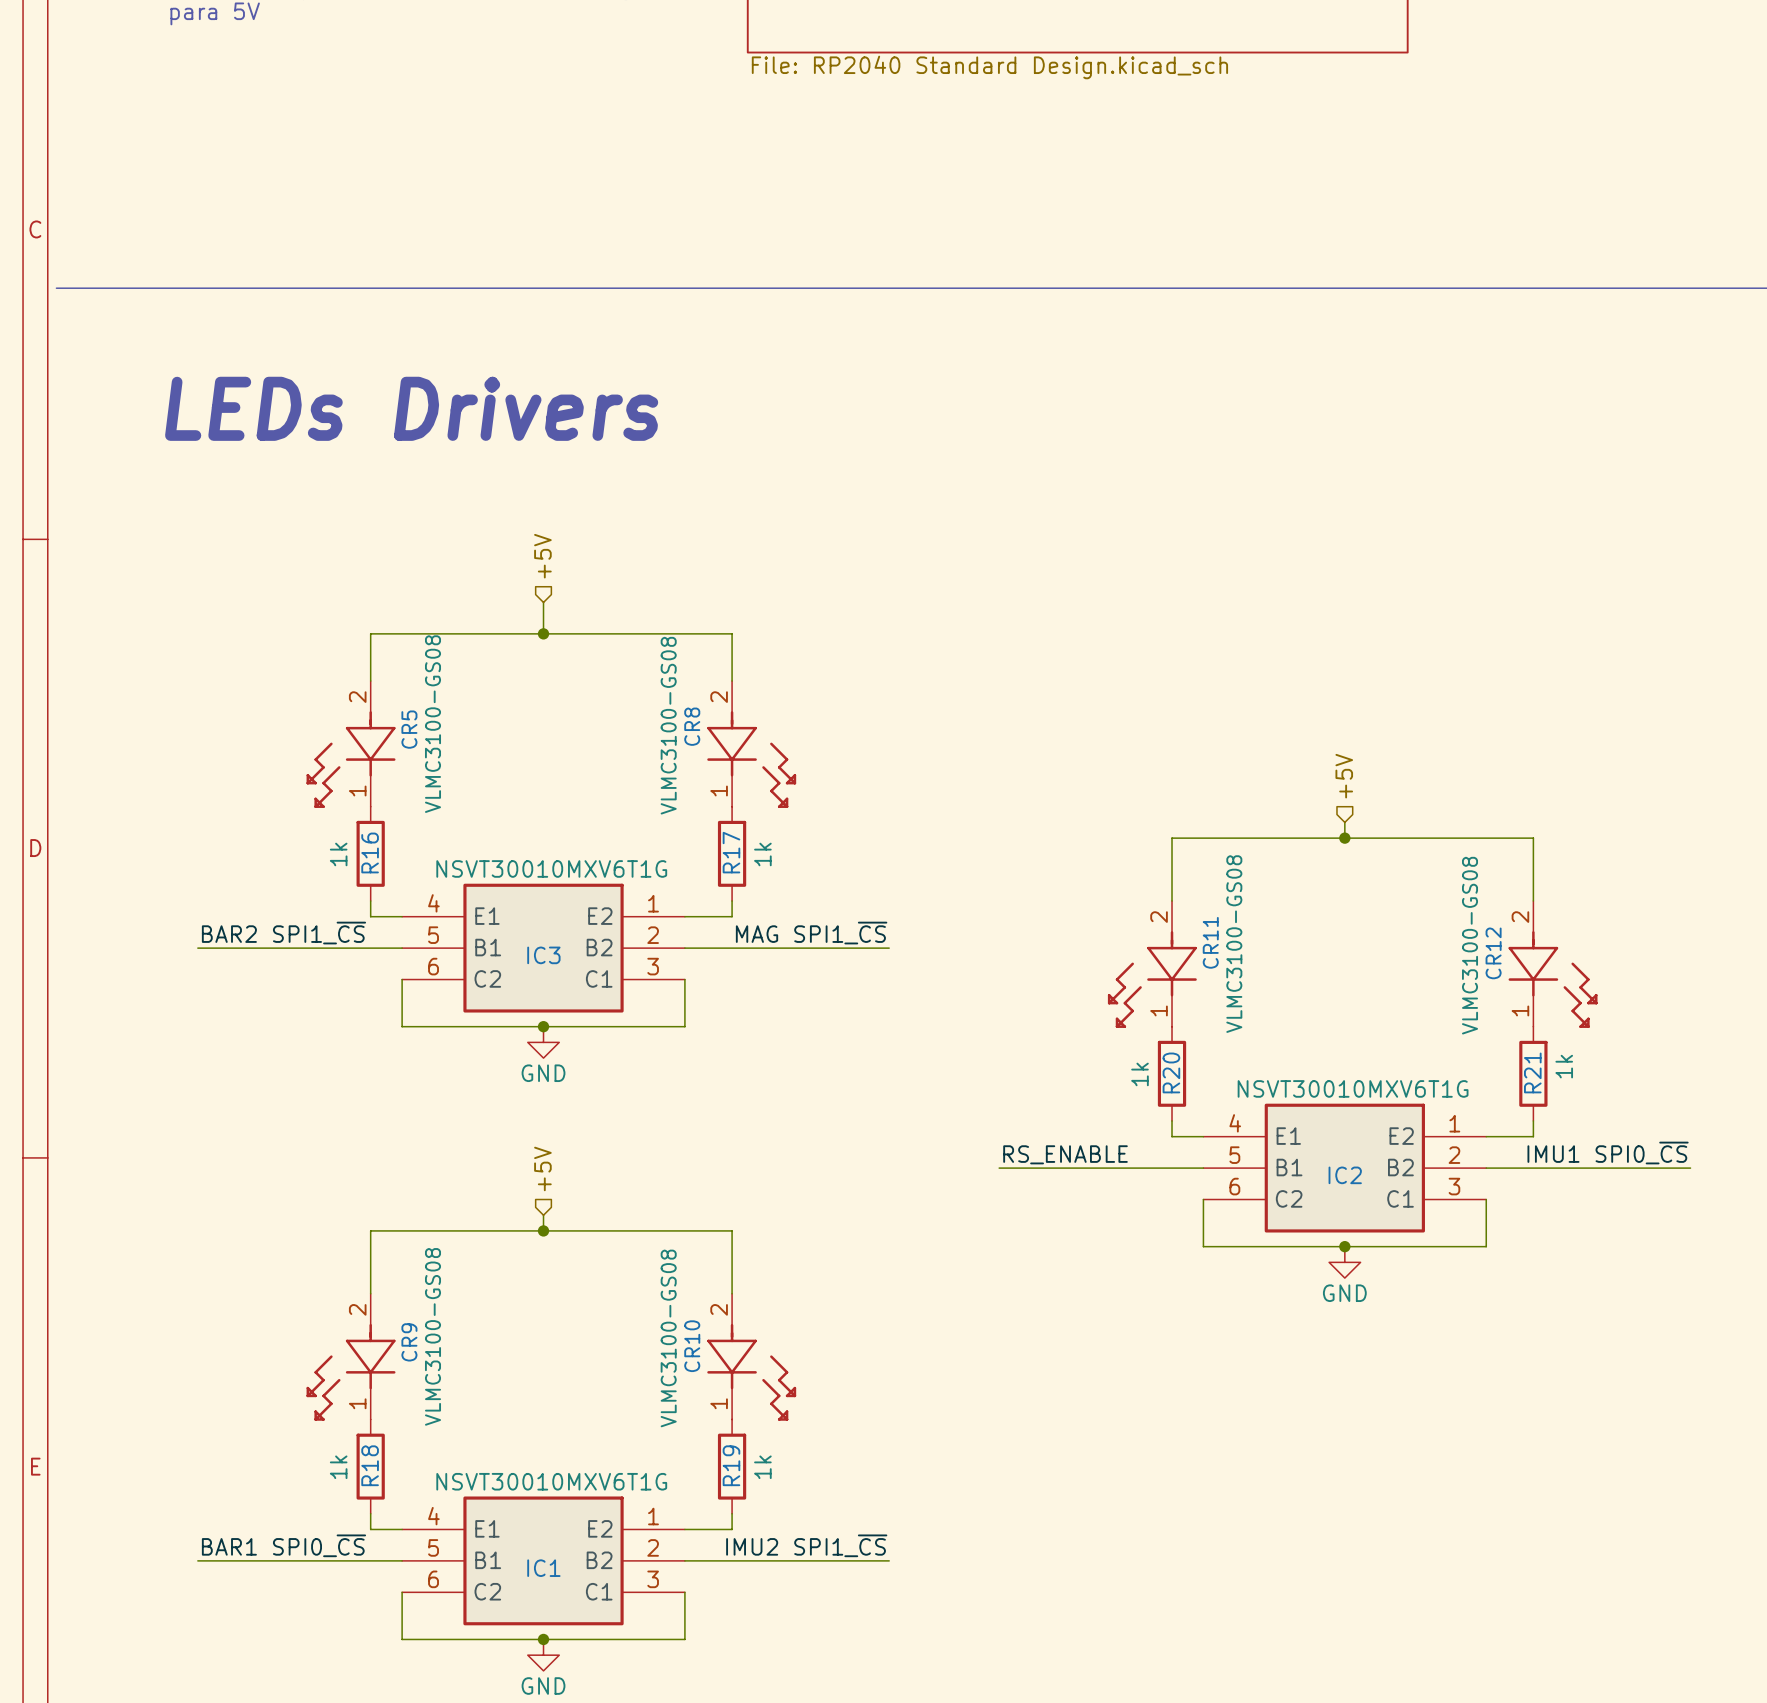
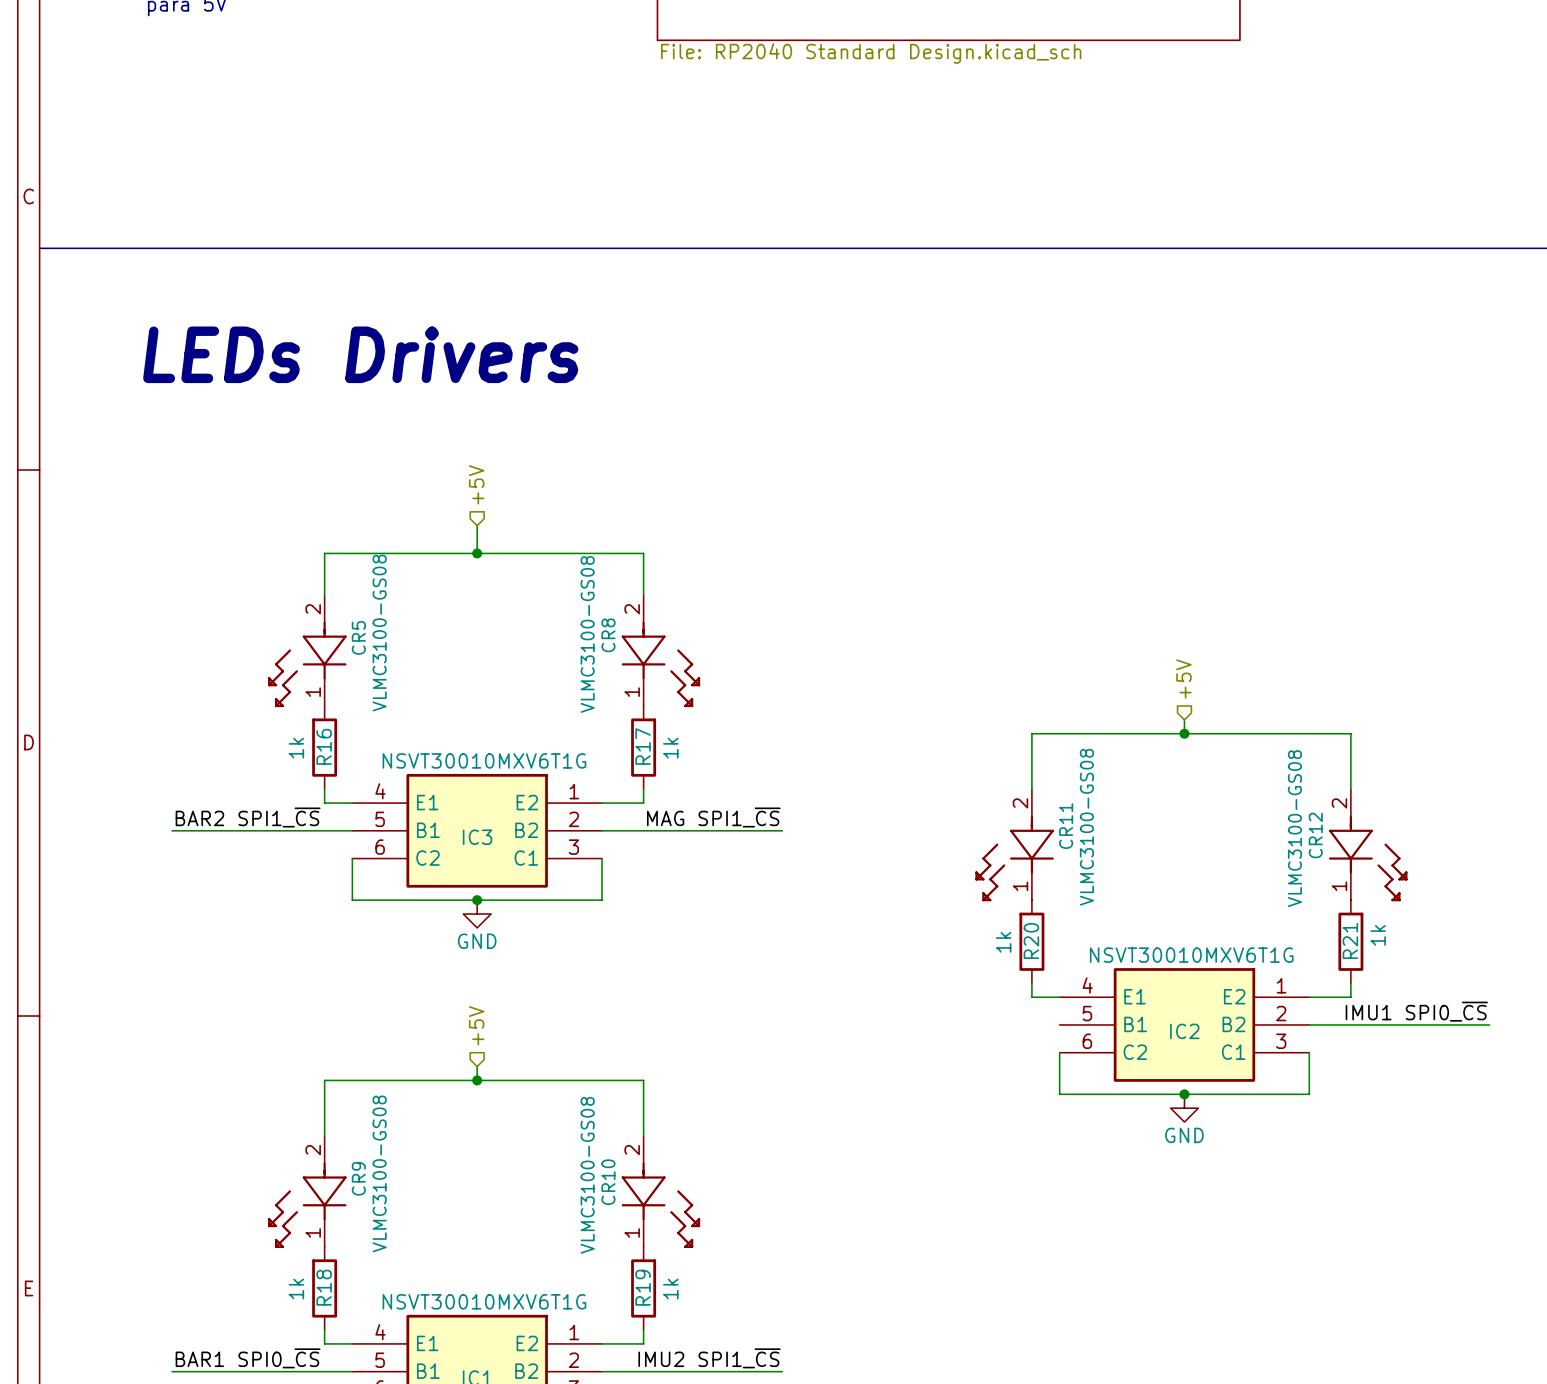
line: none -> (40, 248) (47, 248)
label: RS_ENABLE (1065, 1154) -> none
wire: (999, 1168) (1203, 1168) -> none

